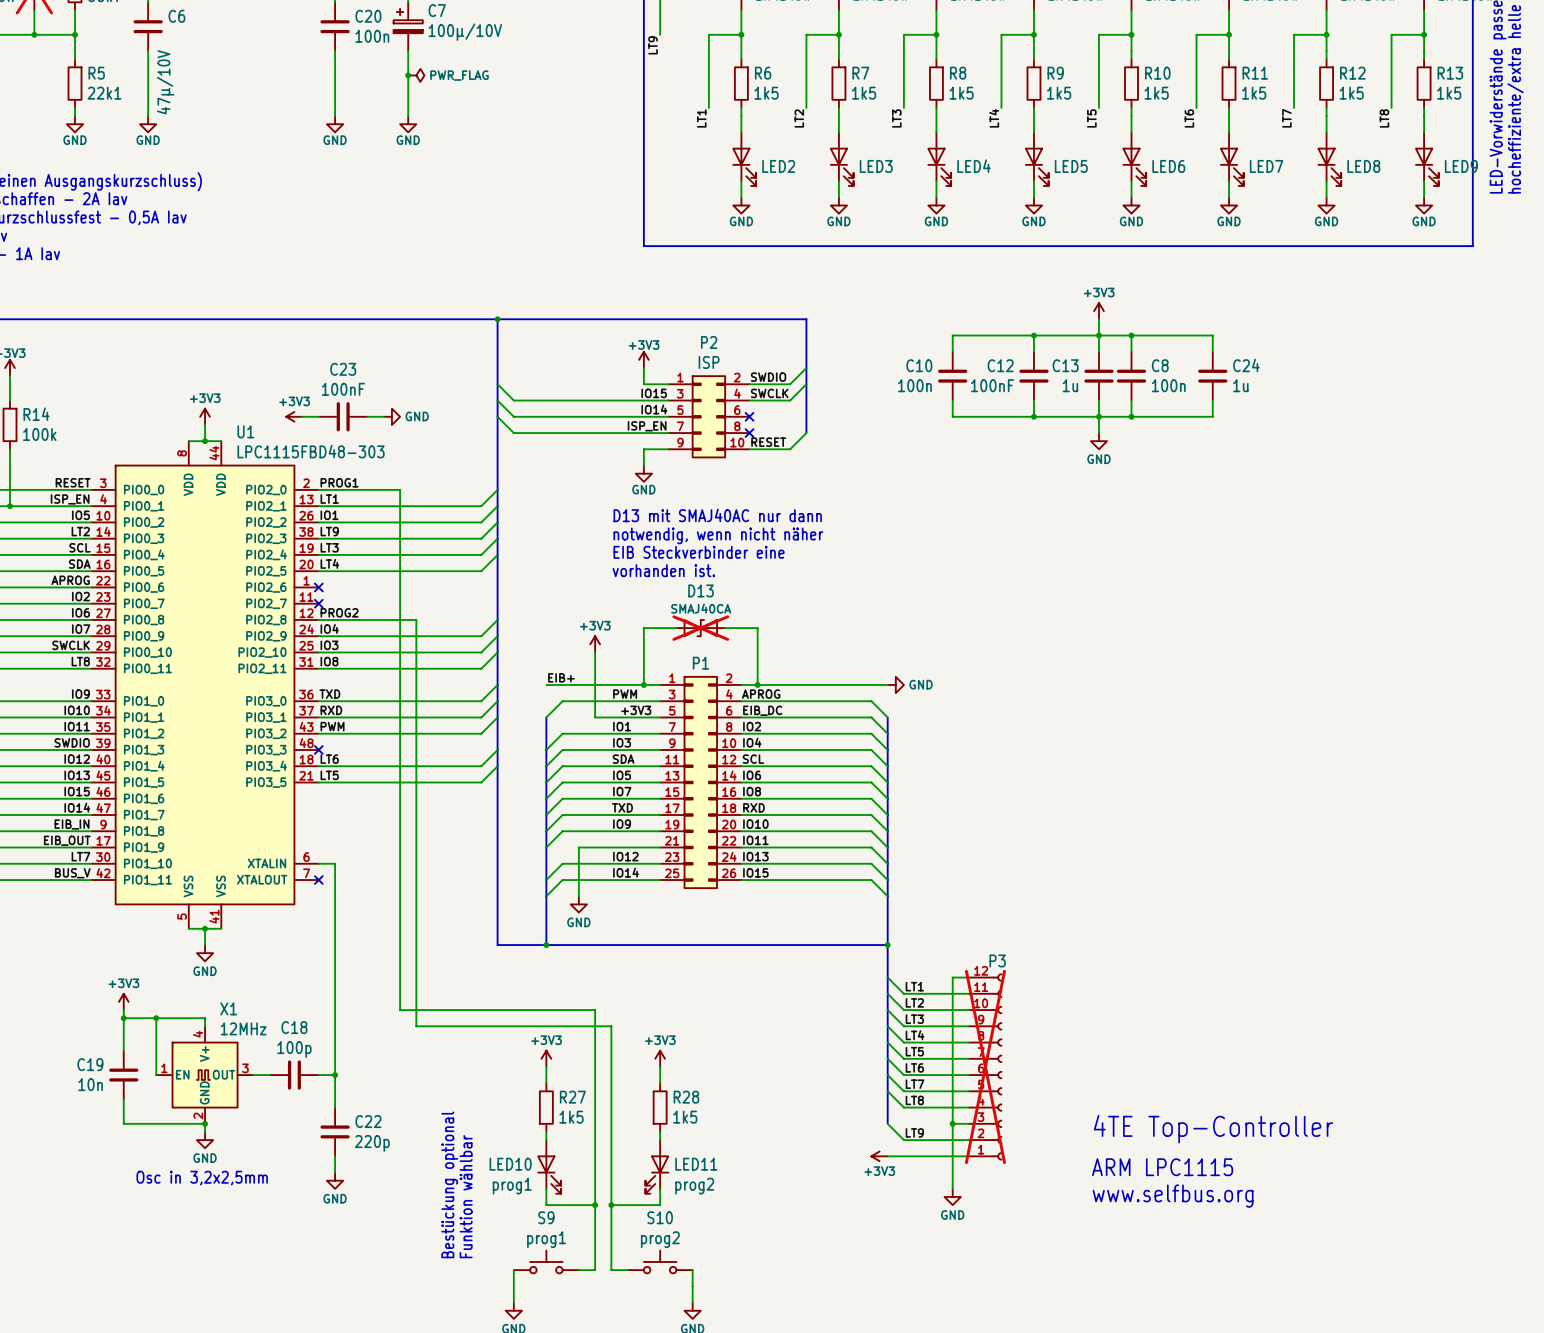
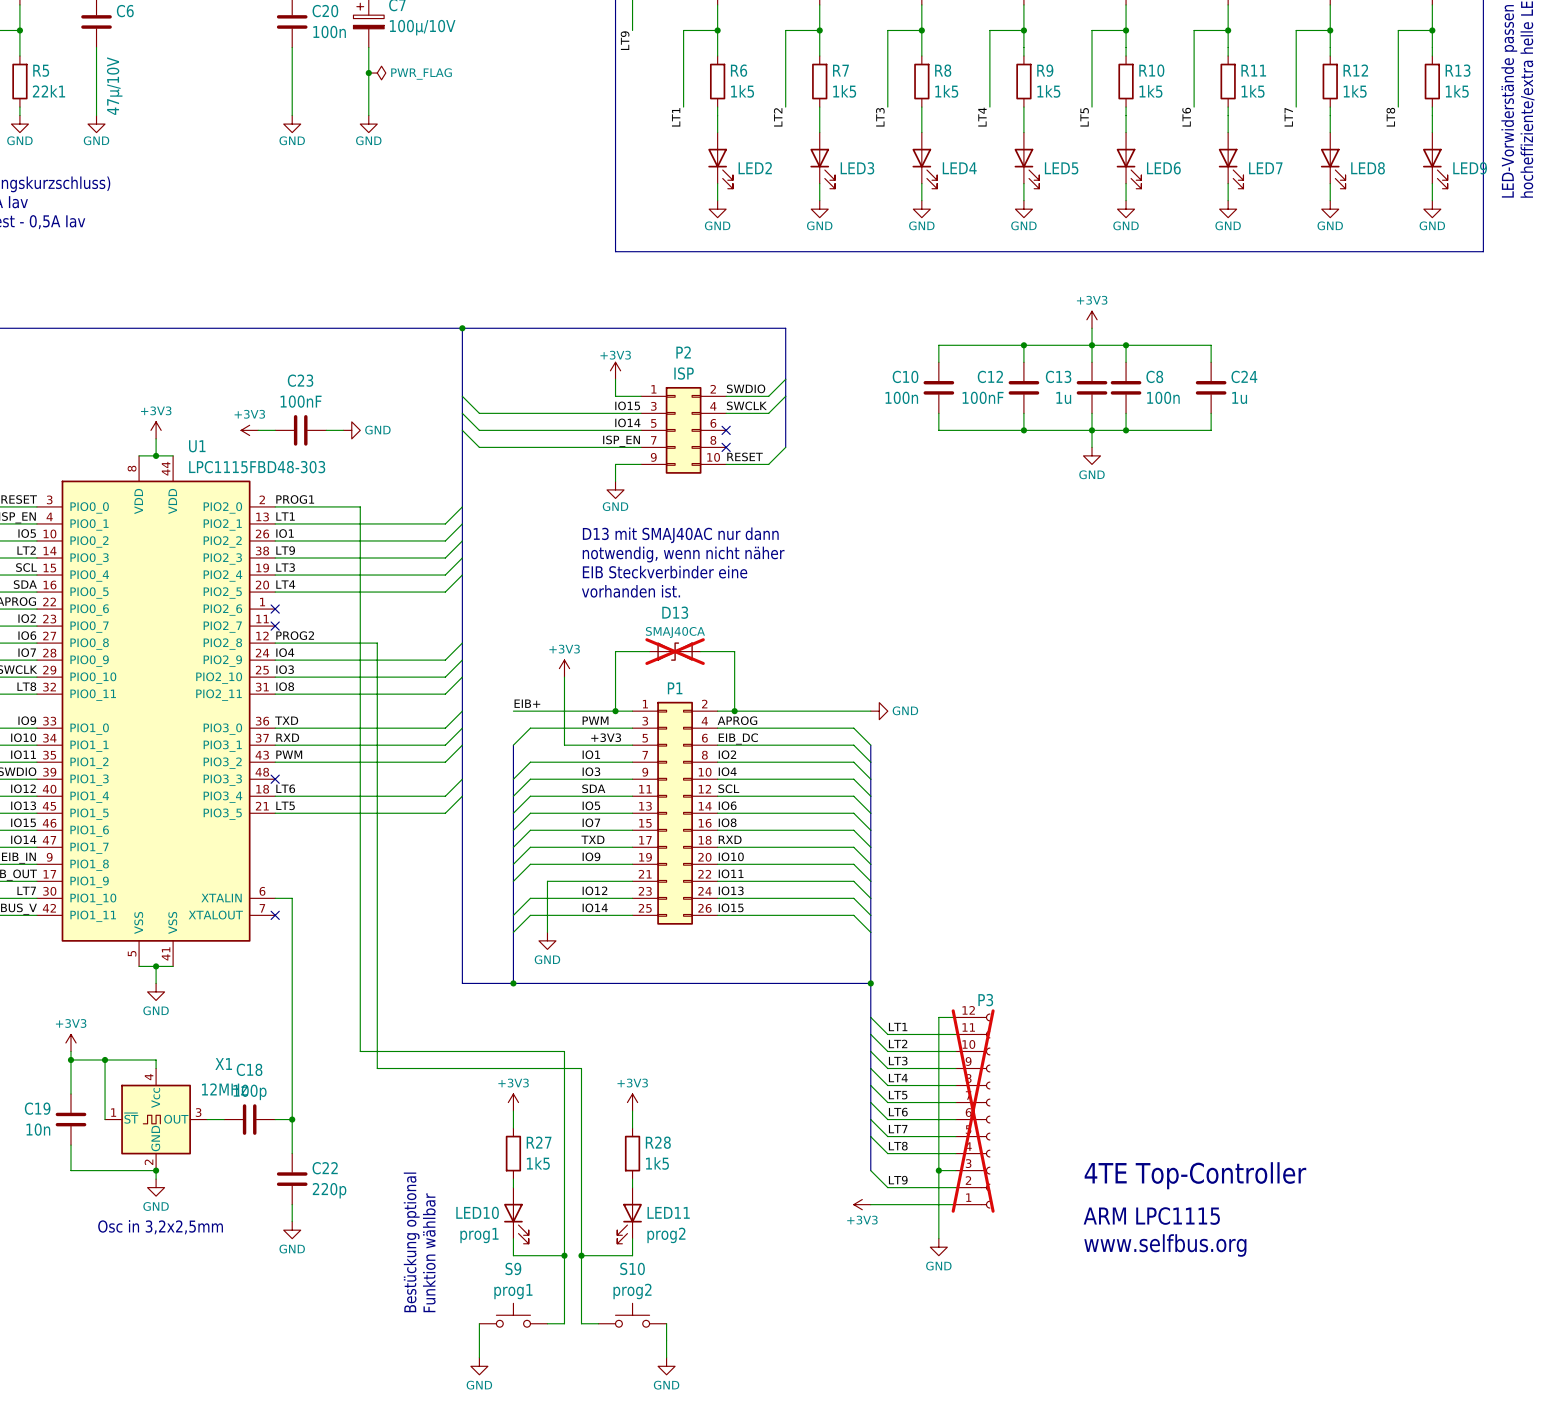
X1 name position: X1 (228, 1008) -> X1 (223, 1064)
X1 symbol: [156, 1026, 254, 1124] -> [105, 1068, 208, 1171]
X1 value position: 12MHz (243, 1028) -> 12MHz (224, 1089)

